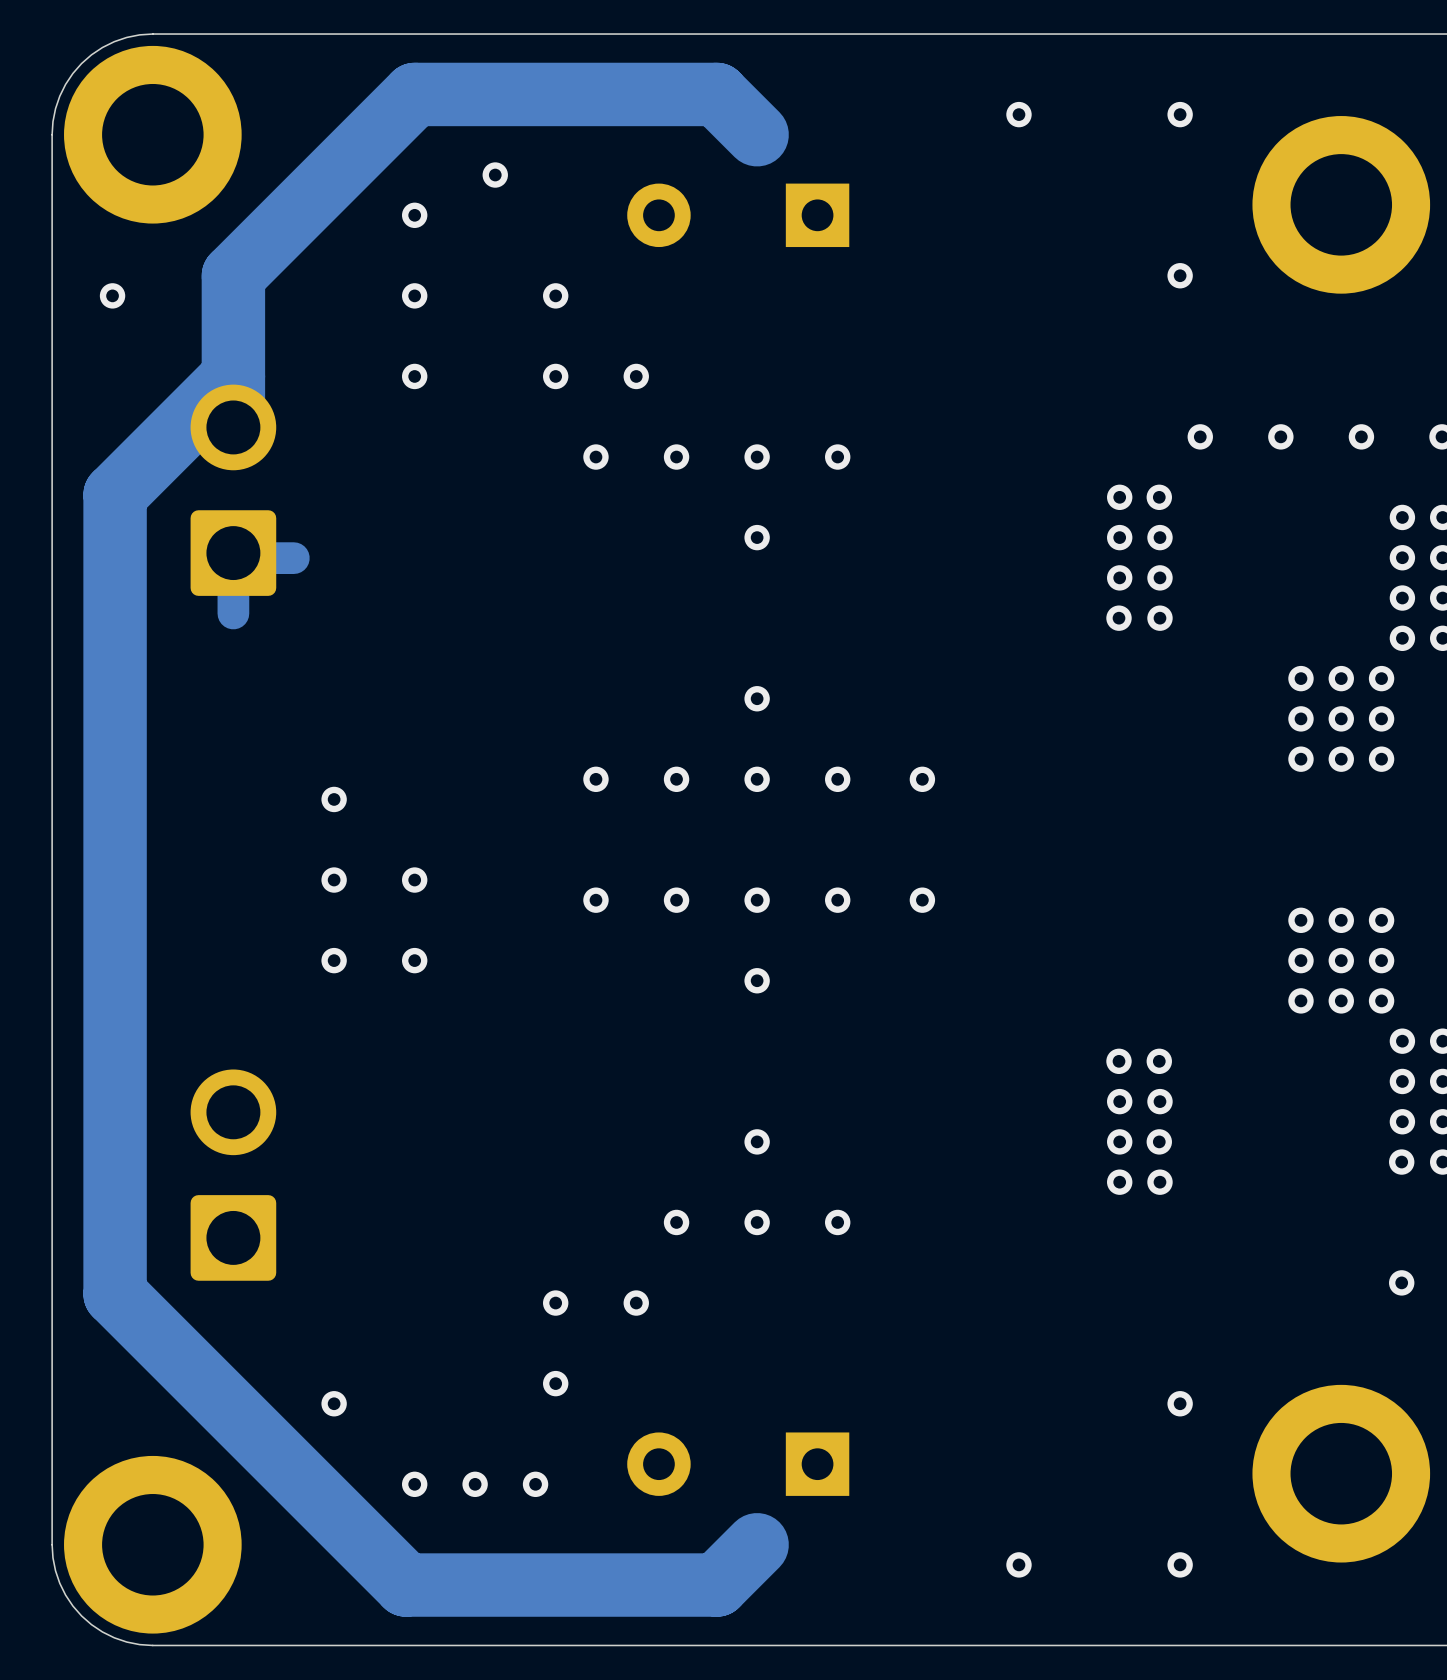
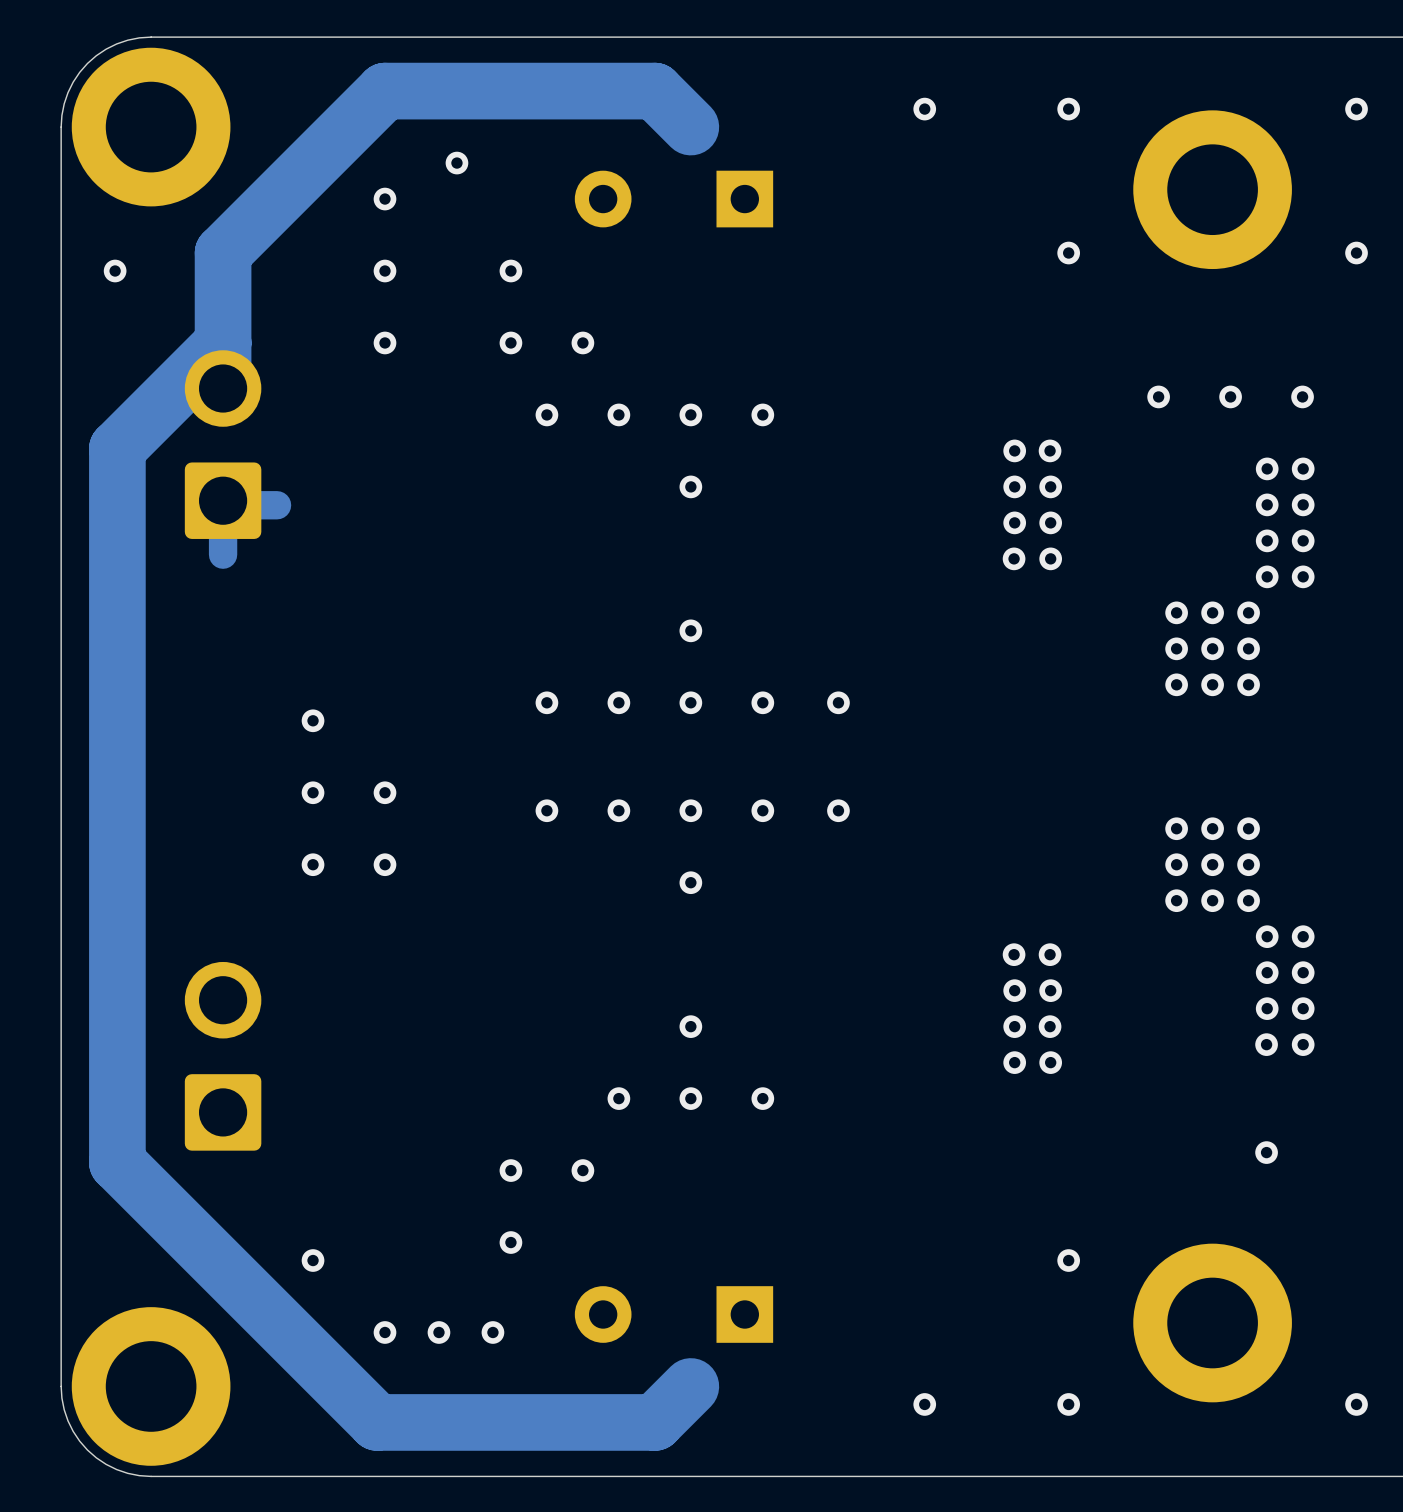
via: (1200, 436) -> none

